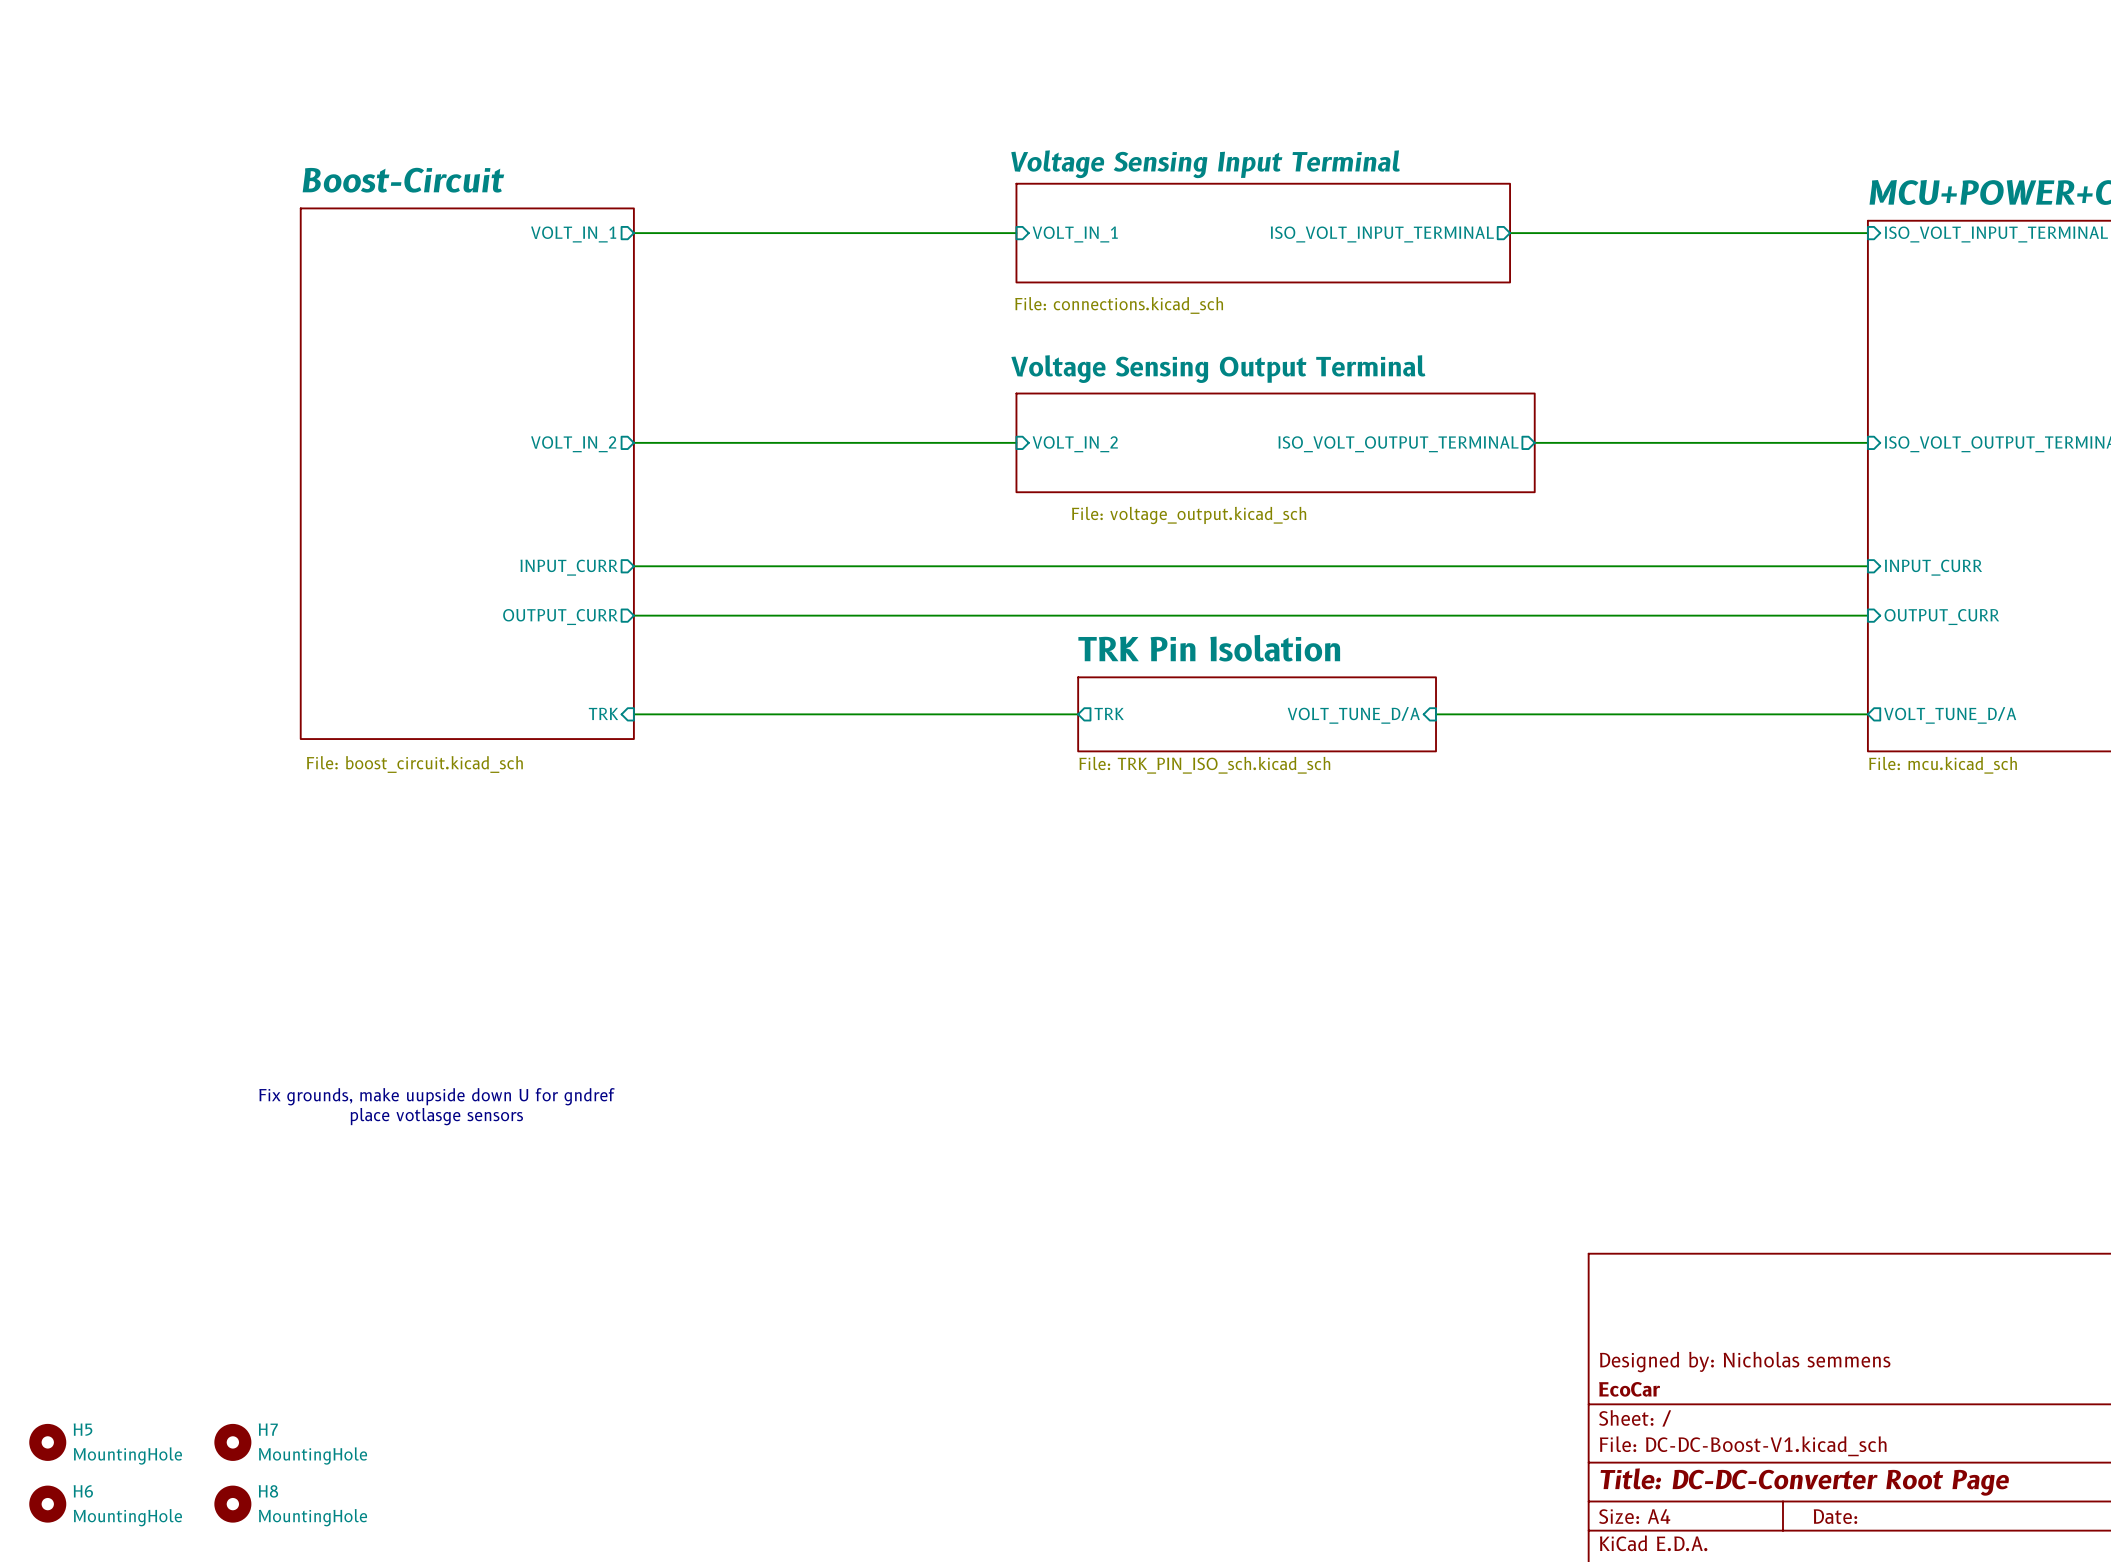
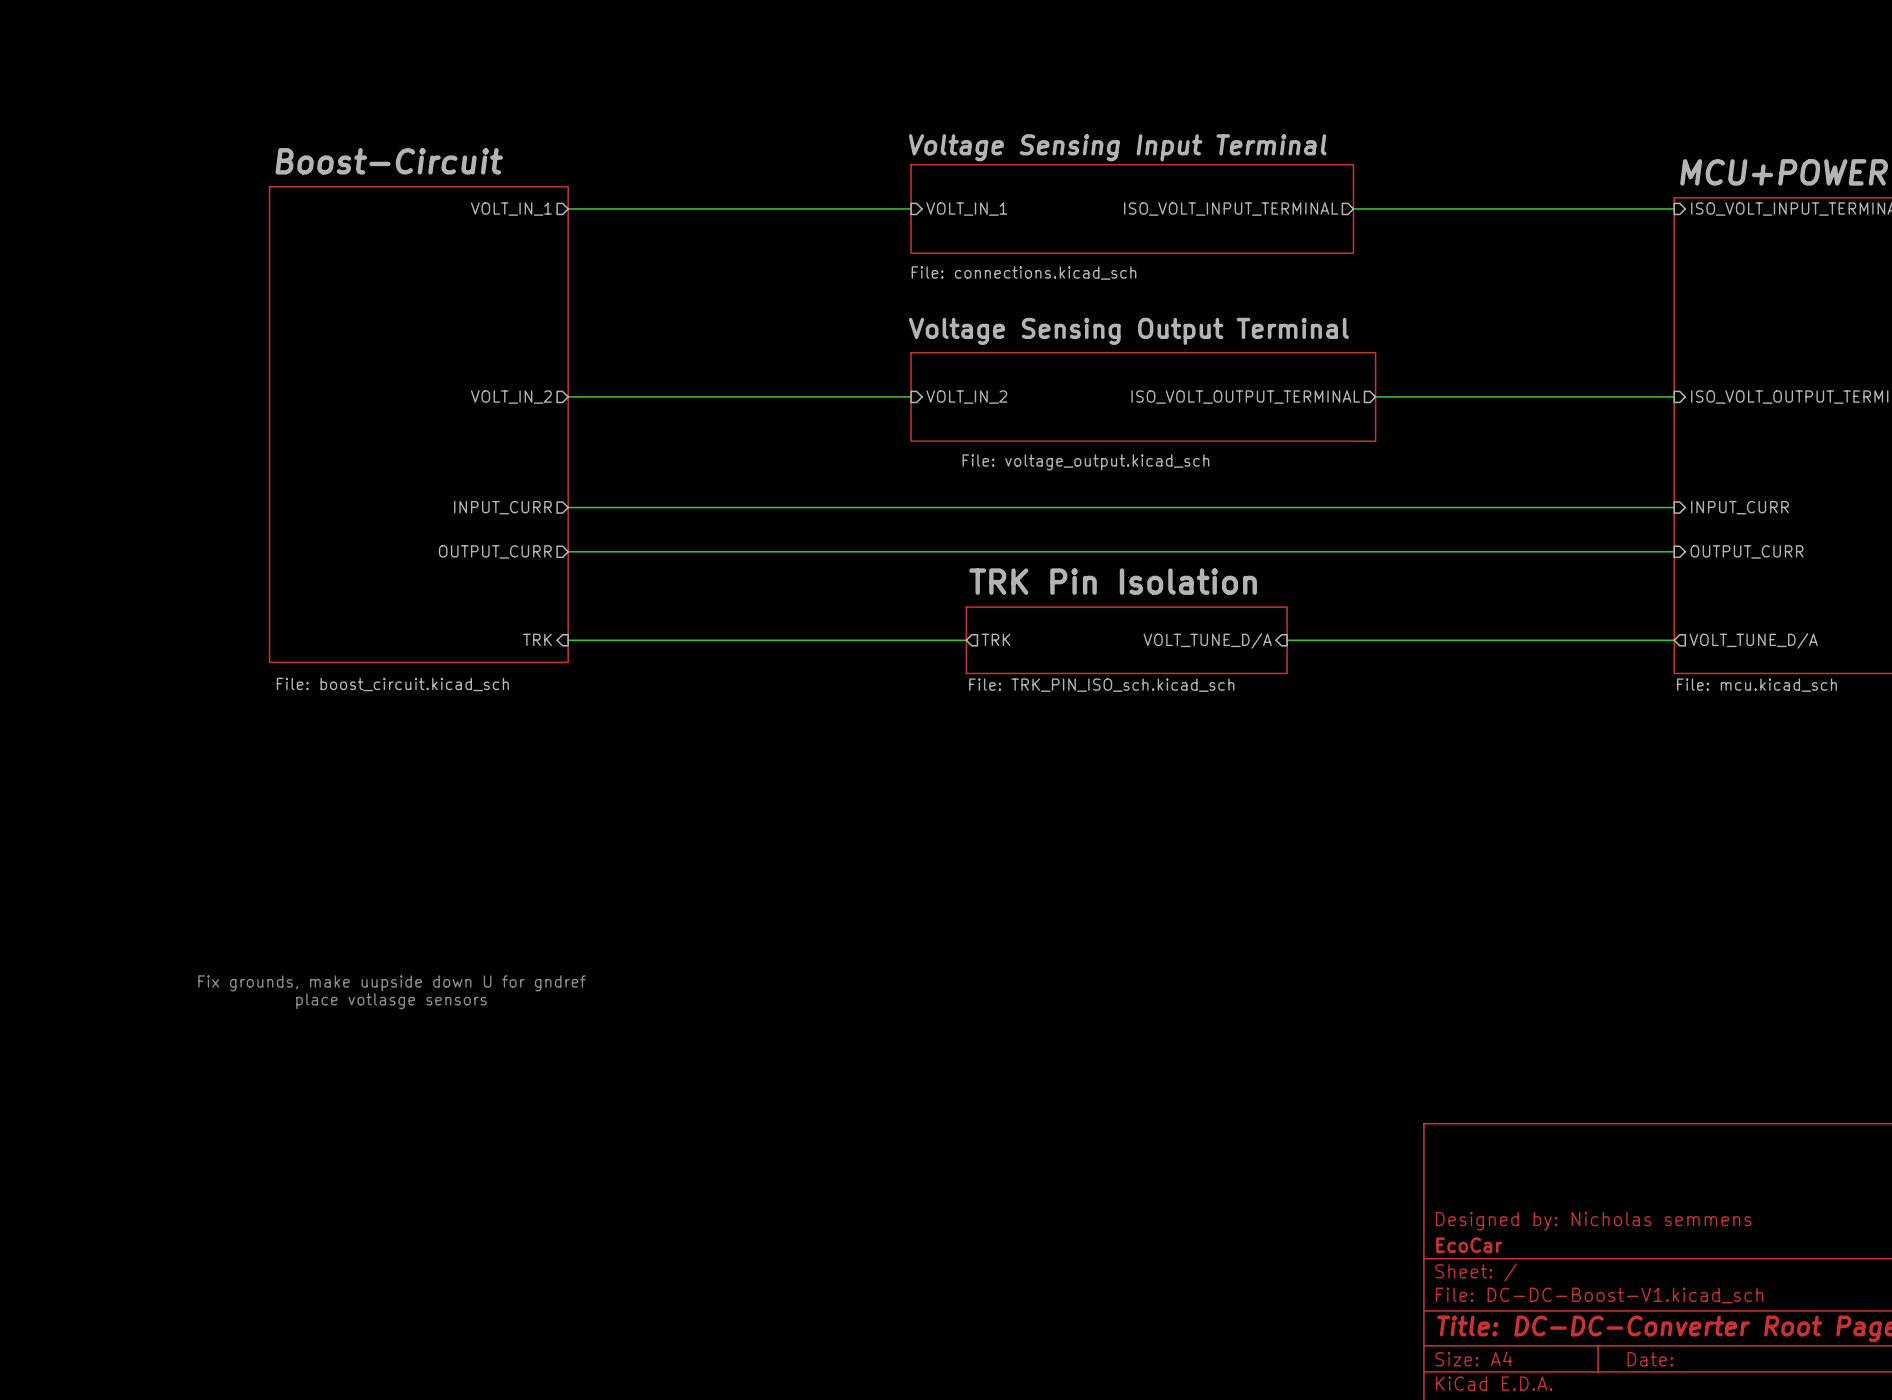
H5: MountingHole (47, 1442) -> none
H7: MountingHole (232, 1442) -> none
H6: MountingHole (47, 1504) -> none
H8: MountingHole (232, 1504) -> none

